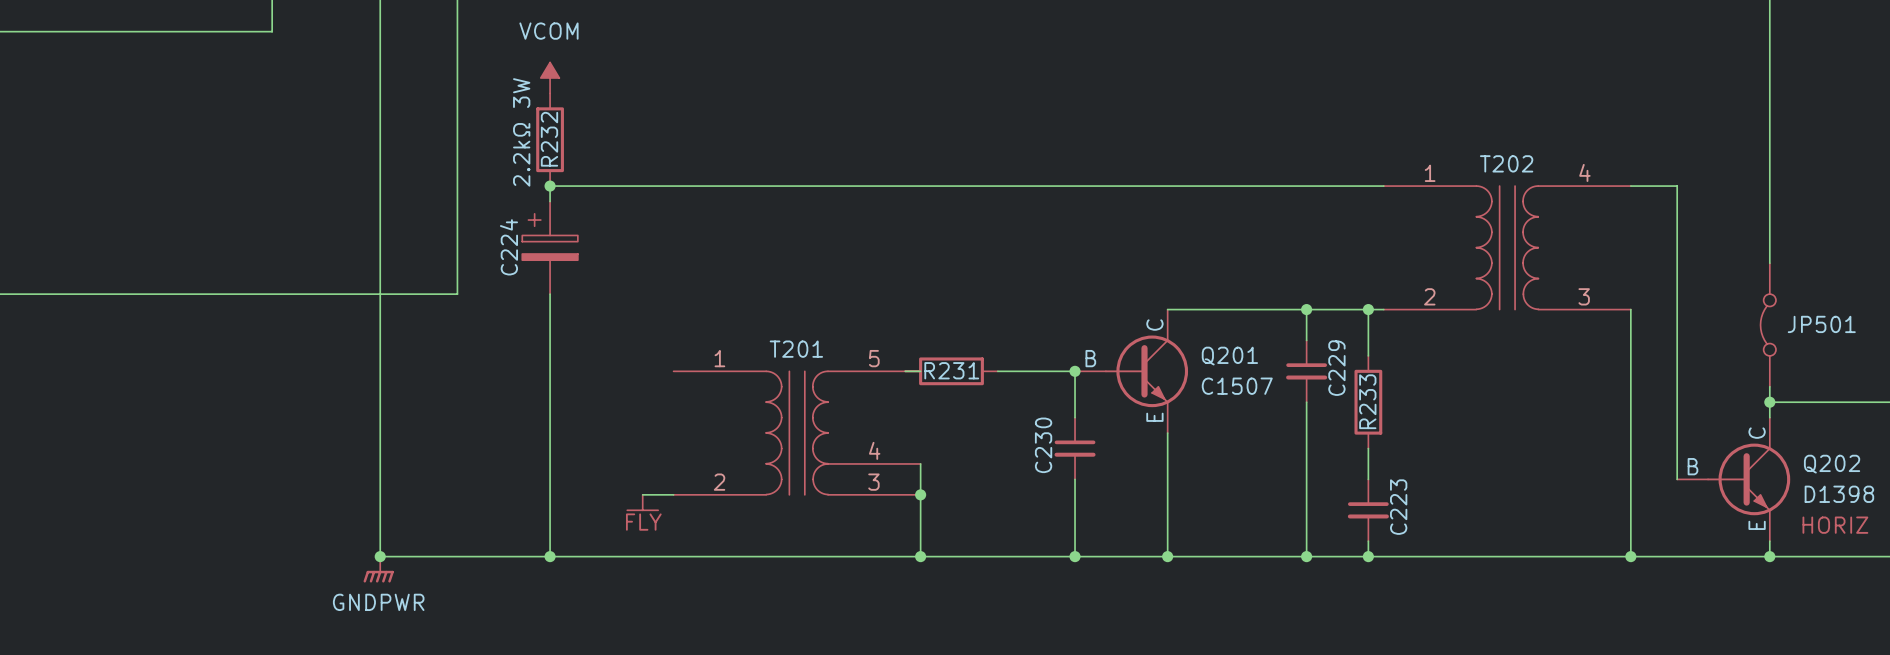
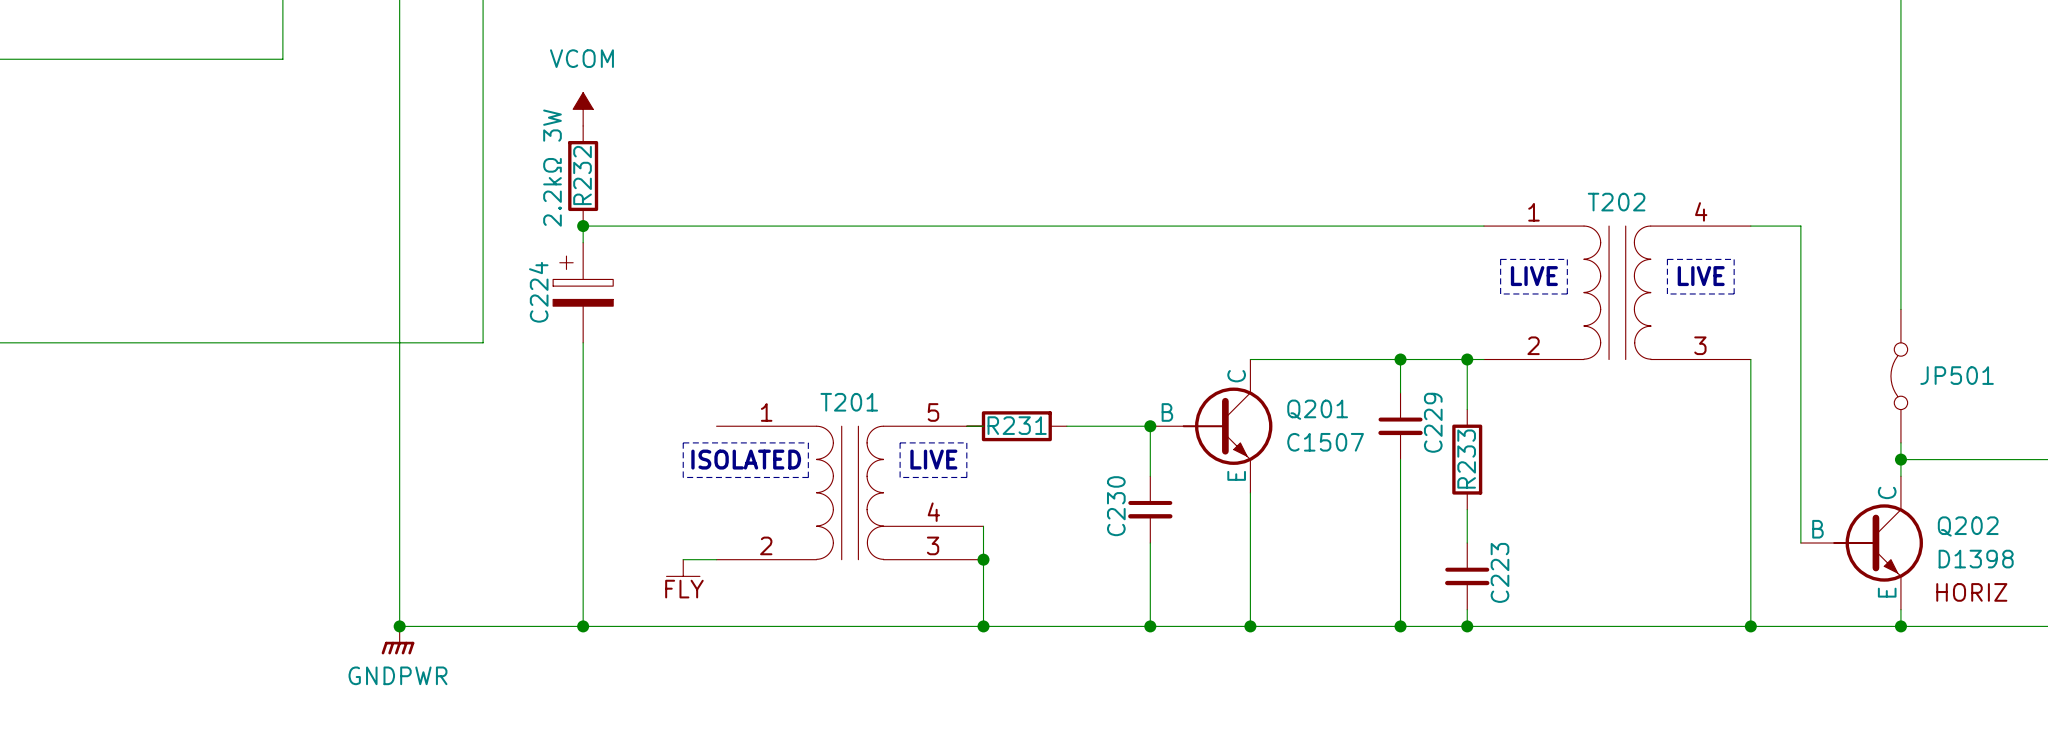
line: none -> (1500, 259) (1567, 259) (1567, 293) (1500, 293) (1500, 259)
line: none -> (1667, 259) (1734, 259) (1734, 293) (1667, 293) (1667, 259)
text: none -> LIVE (1534, 276)
text: none -> LIVE (1701, 276)
line: none -> (683, 442) (808, 442) (808, 477) (683, 477) (683, 442)
line: none -> (900, 442) (966, 442) (966, 477) (900, 477) (900, 442)
text: none -> ISOLATED (746, 459)
text: none -> LIVE (933, 459)

